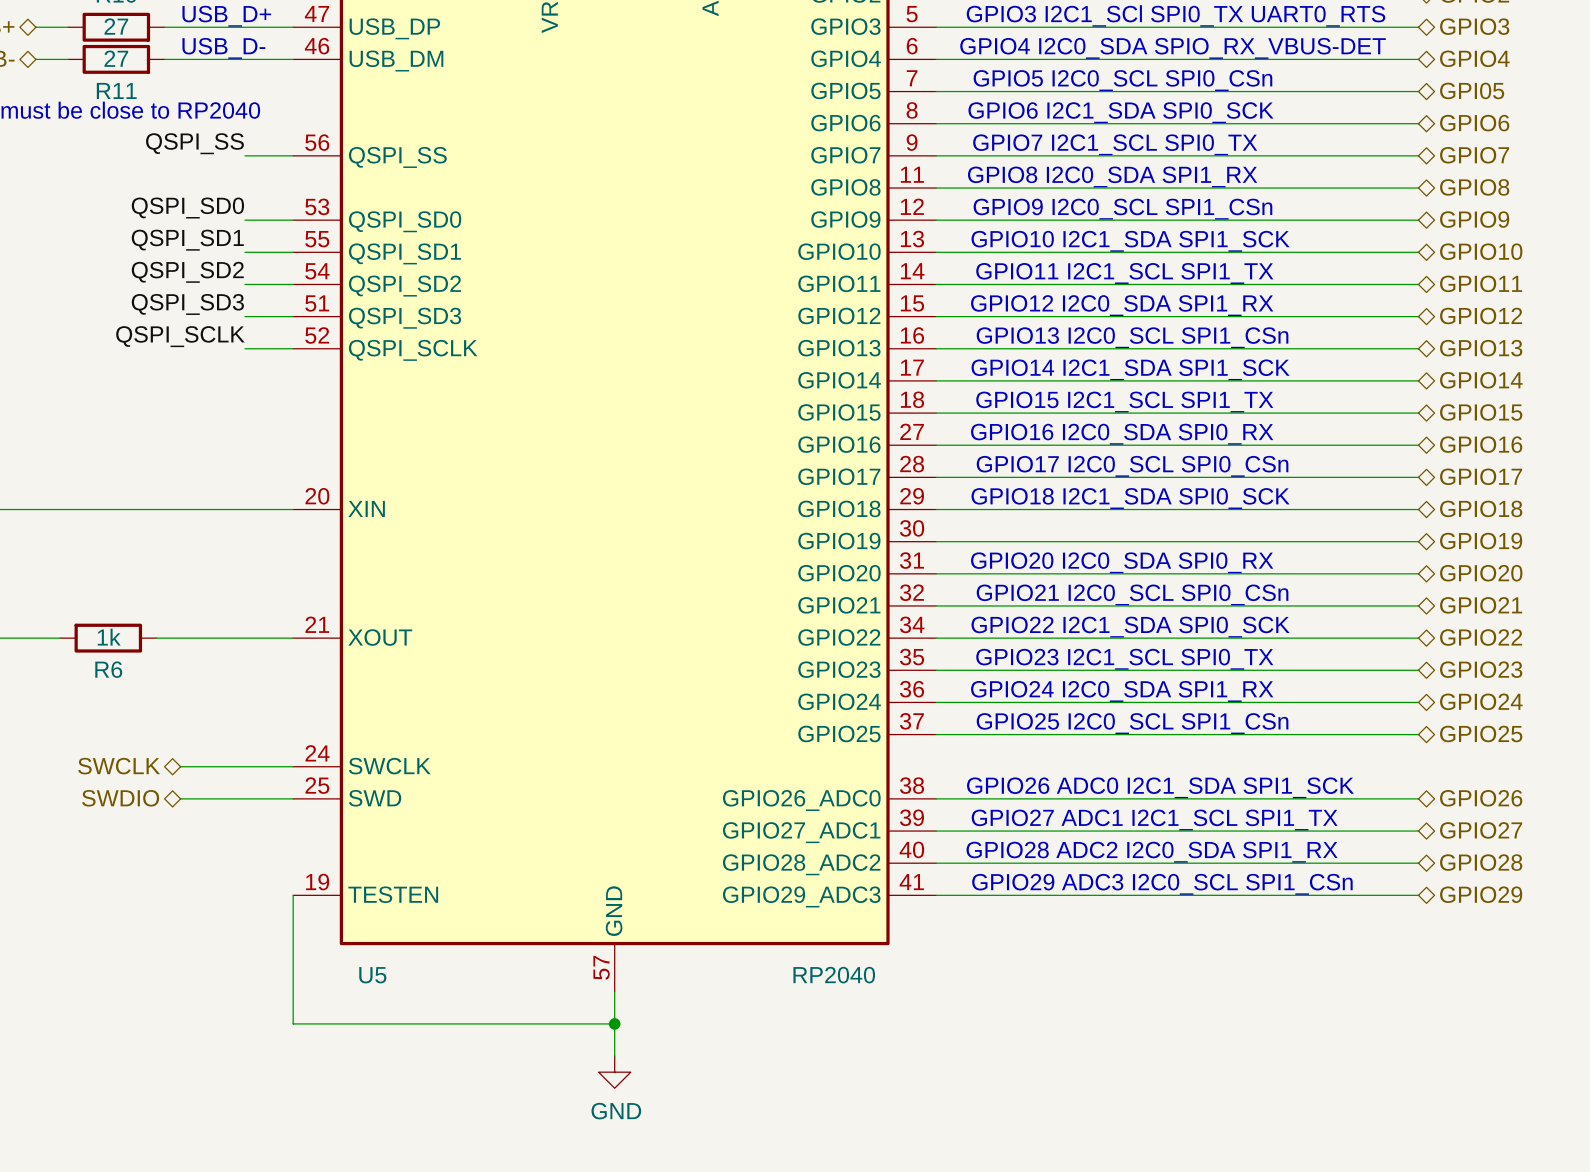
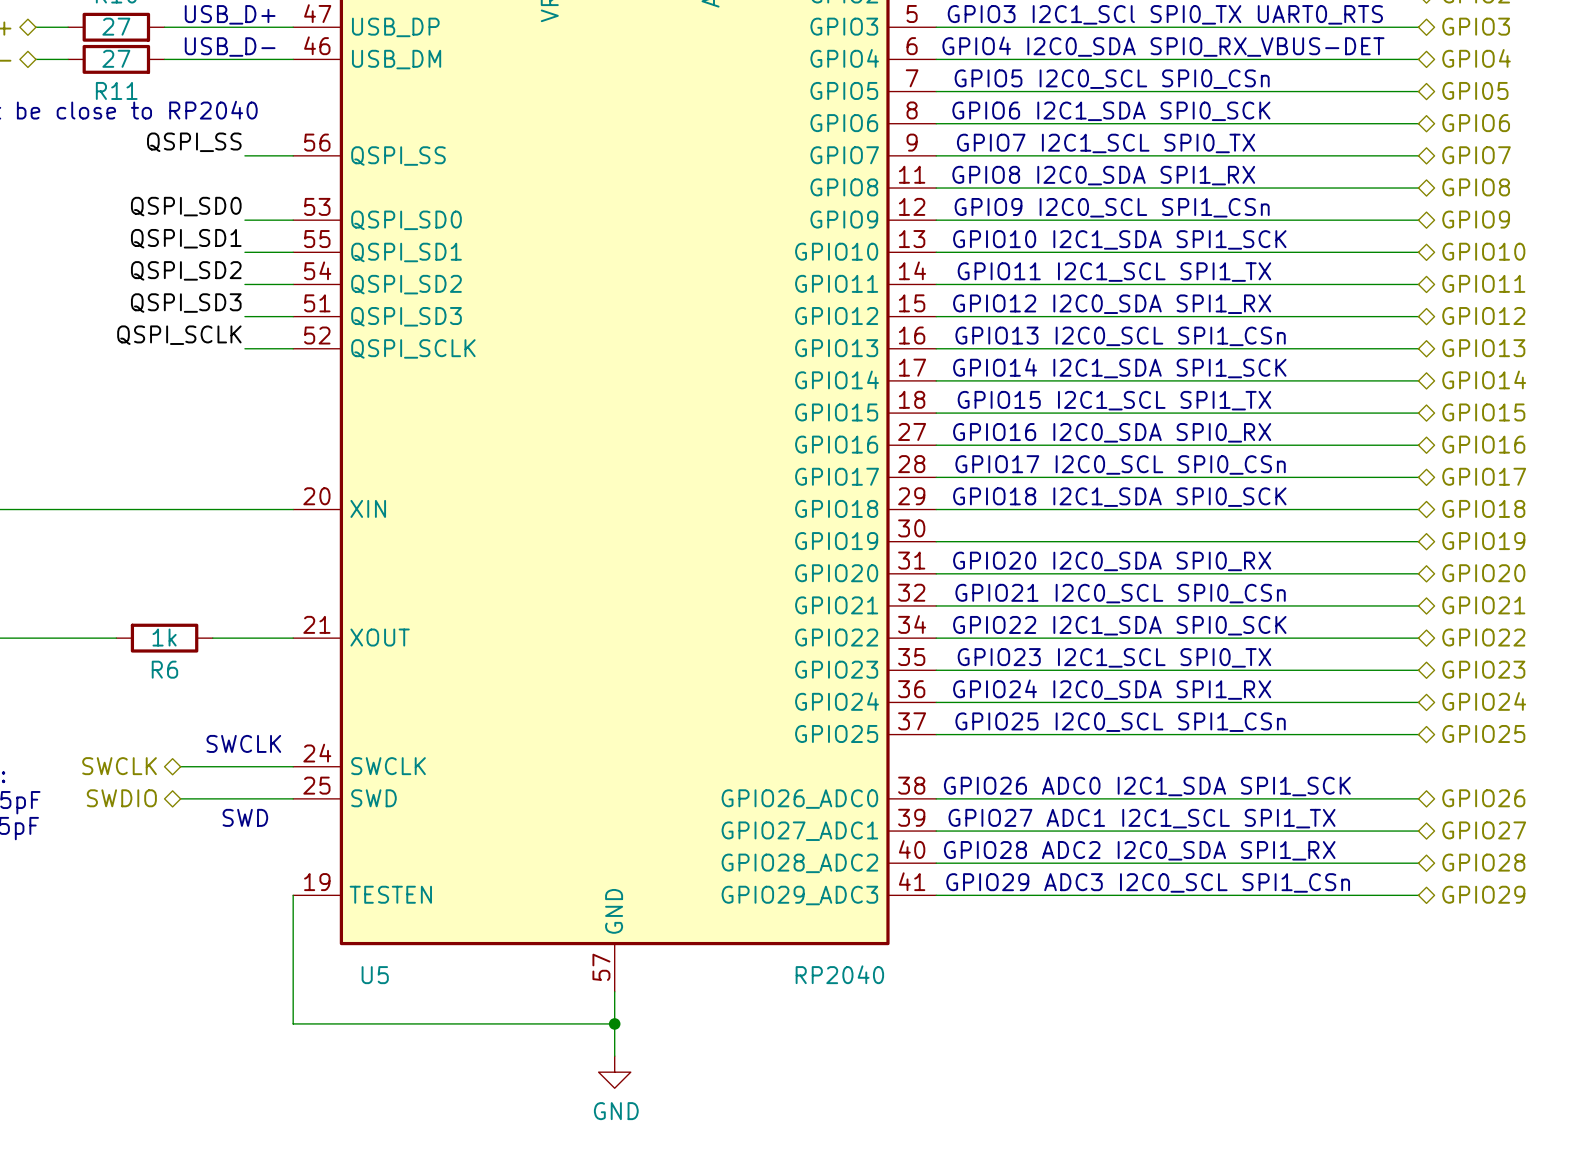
R6 position: (108, 638) -> (164, 638)
wire: (156, 638) (212, 638) -> (60, 638) (116, 638)
text: none -> SWCLK (243, 743)
text: none -> SWD (245, 817)

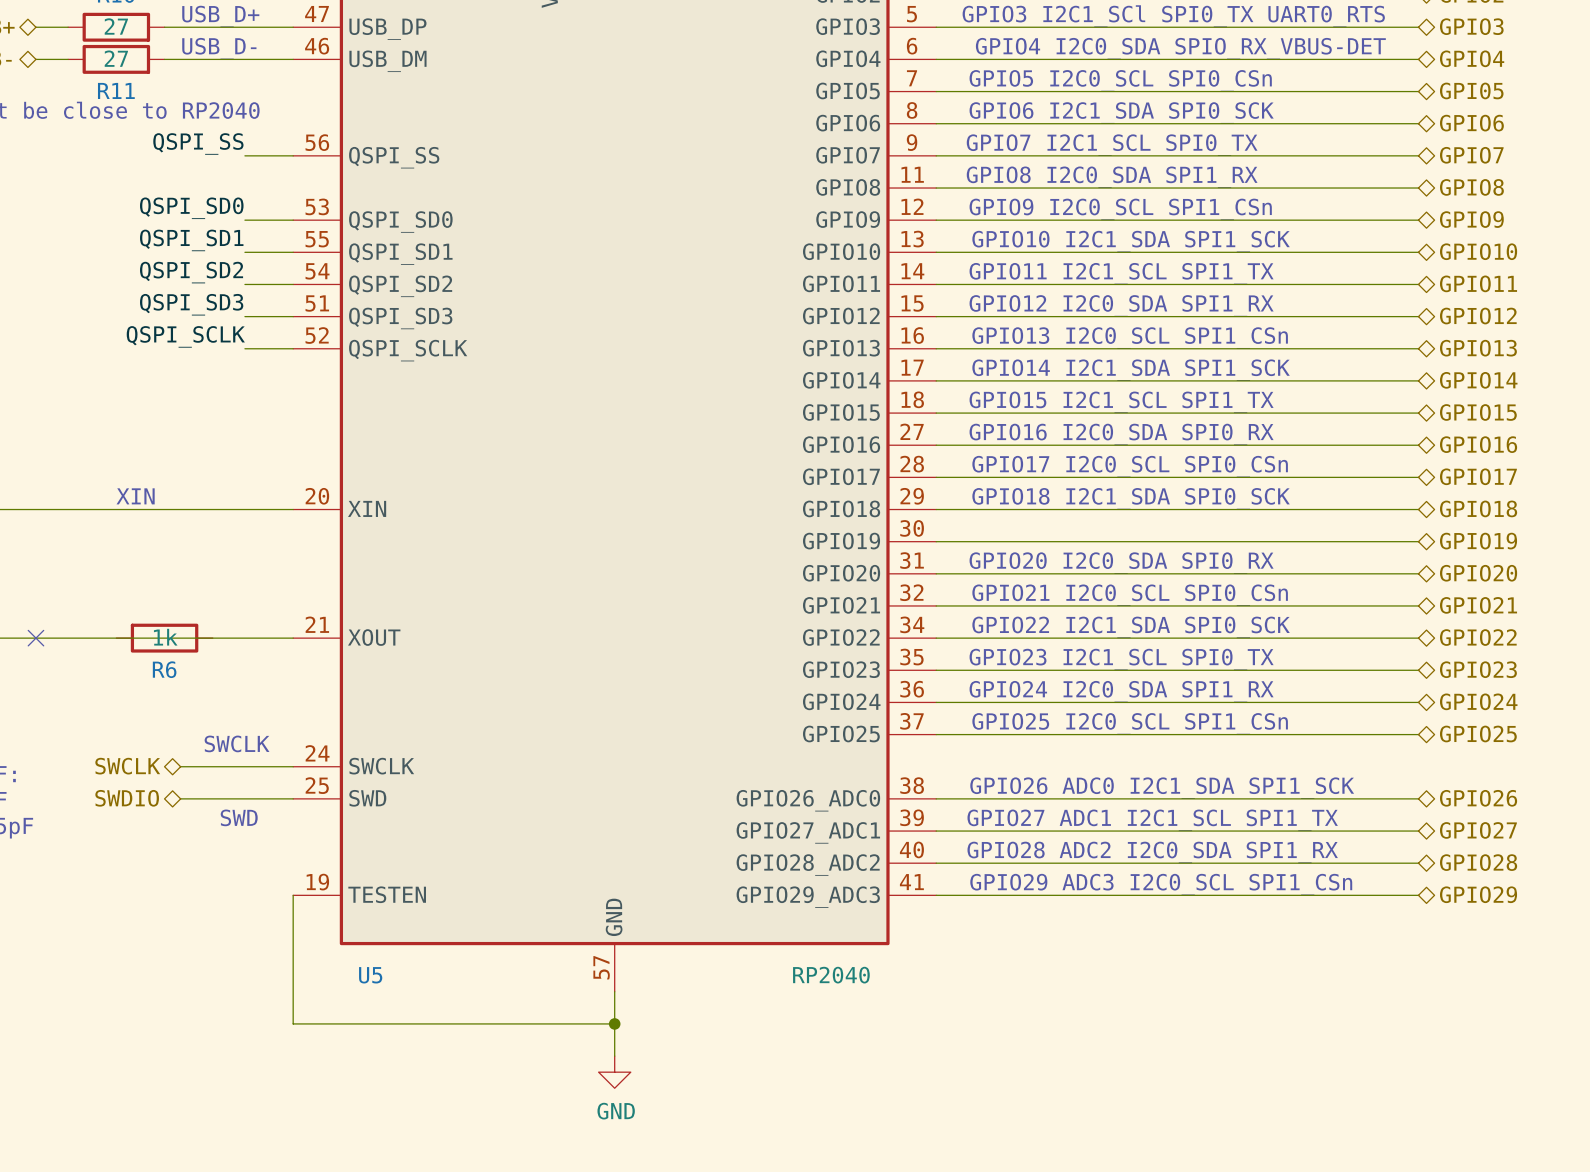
text: none -> XIN (135, 496)
no-connect mark: none -> (35, 638)
wire: none -> (116, 638) (212, 638)

